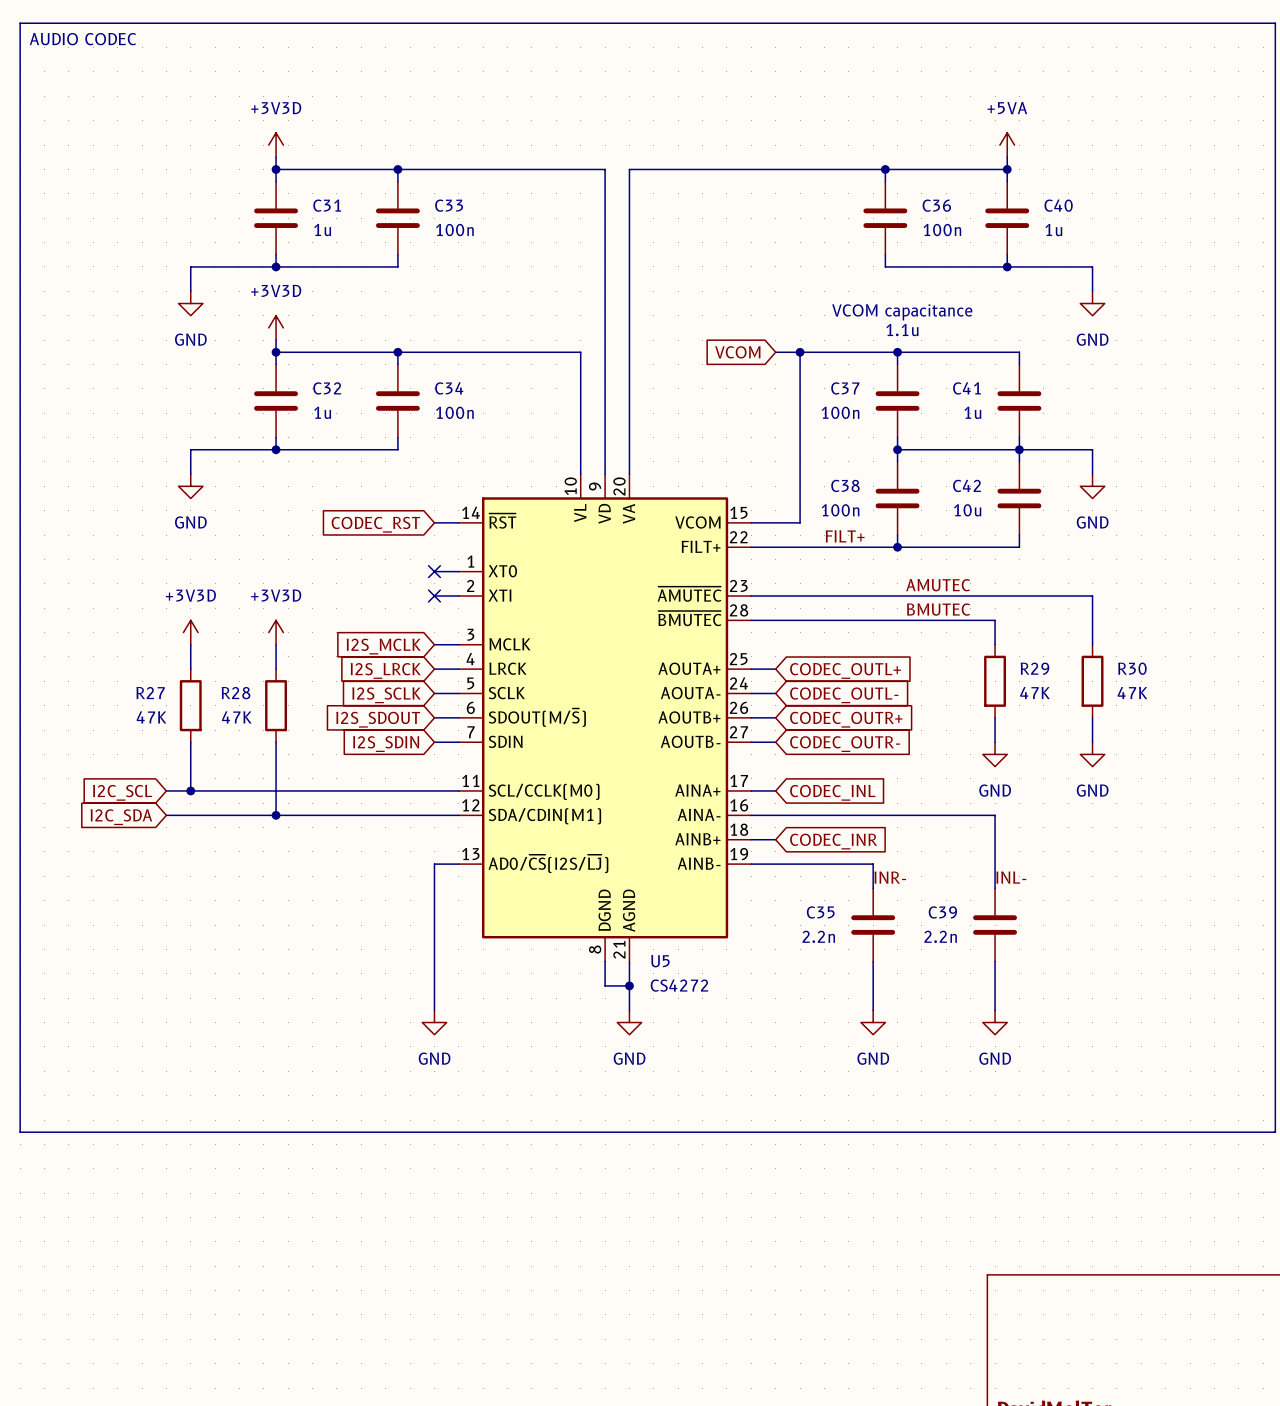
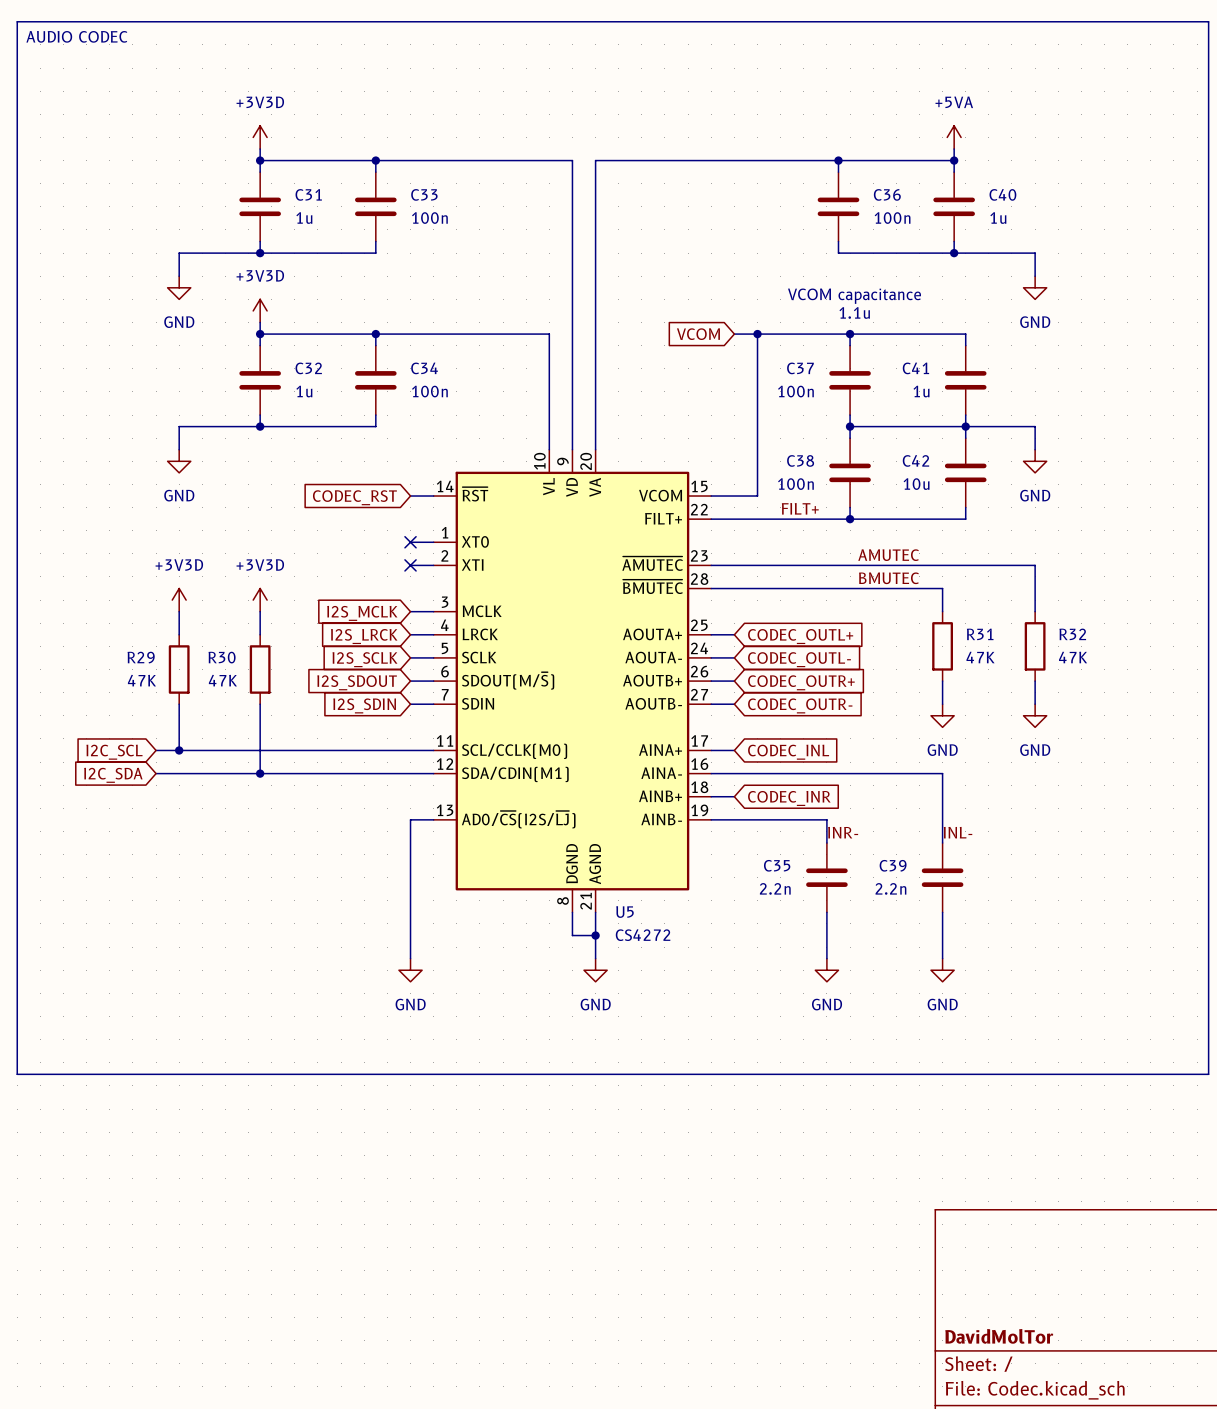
R29 name: R29 (1034, 668) -> R31 (980, 634)
R30 name: R30 (1132, 668) -> R32 (1072, 634)
R27 name: R27 (150, 693) -> R29 (141, 657)
R28 name: R28 (235, 693) -> R30 (222, 657)

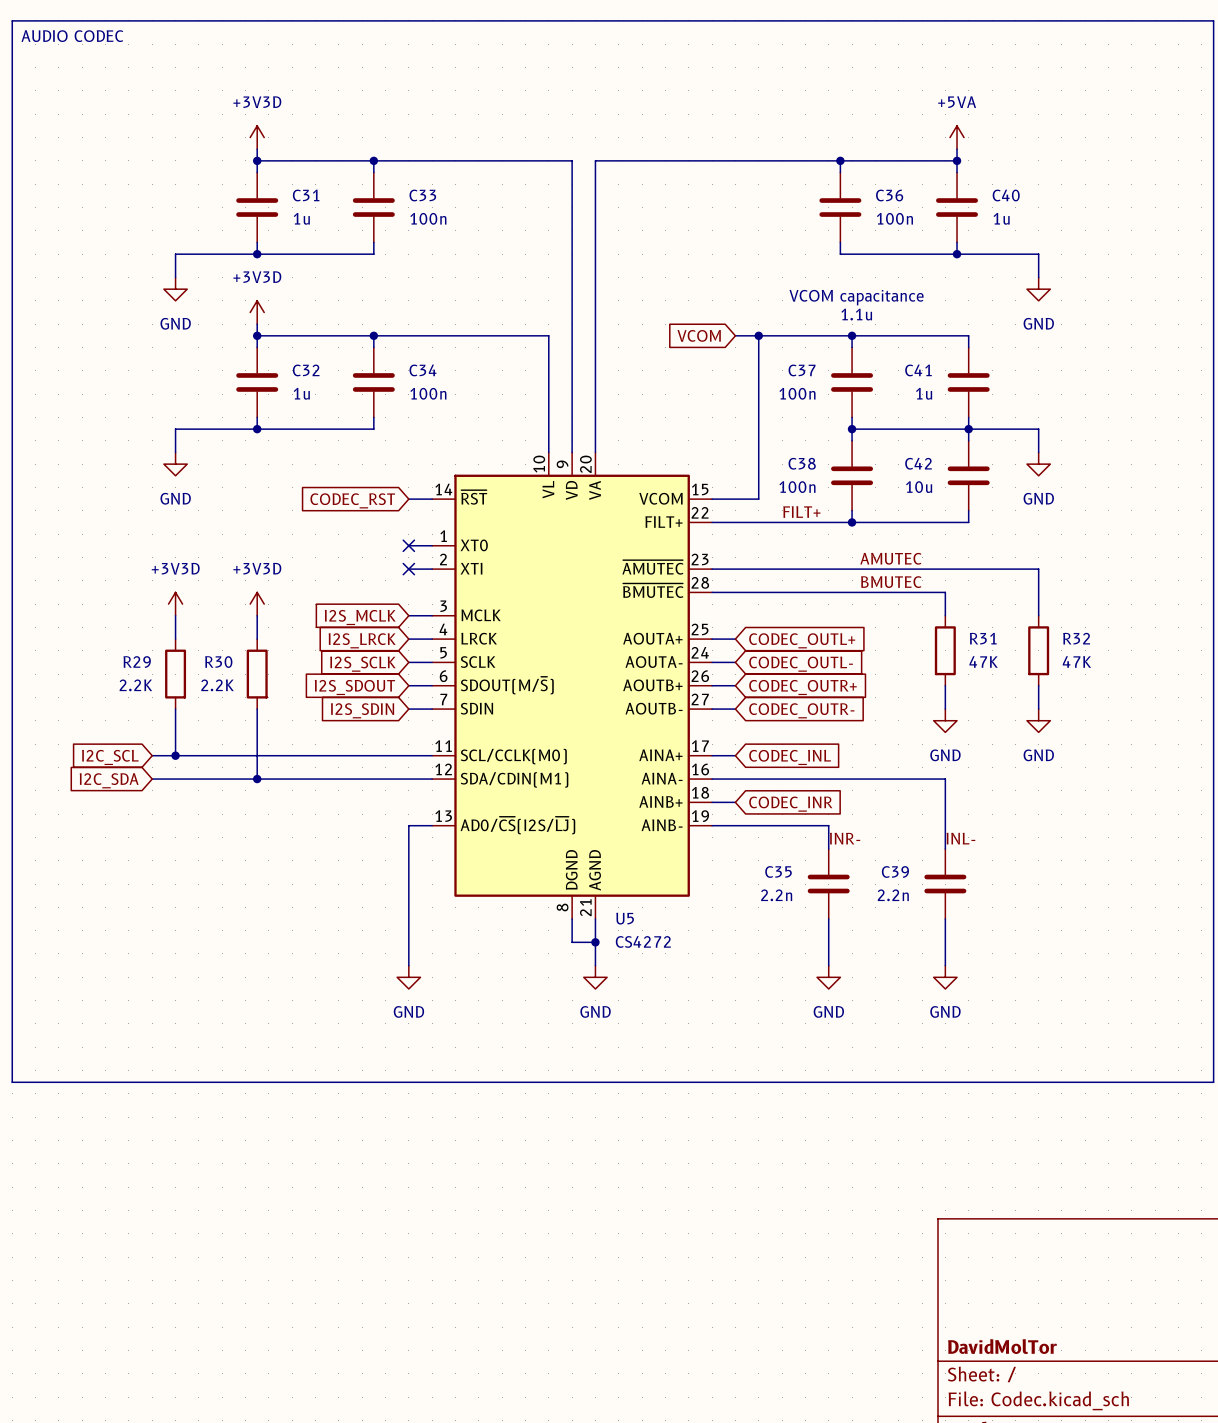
R29 value: 47K (141, 680) -> 2.2K (135, 685)
R30 value: 47K (222, 680) -> 2.2K (217, 685)

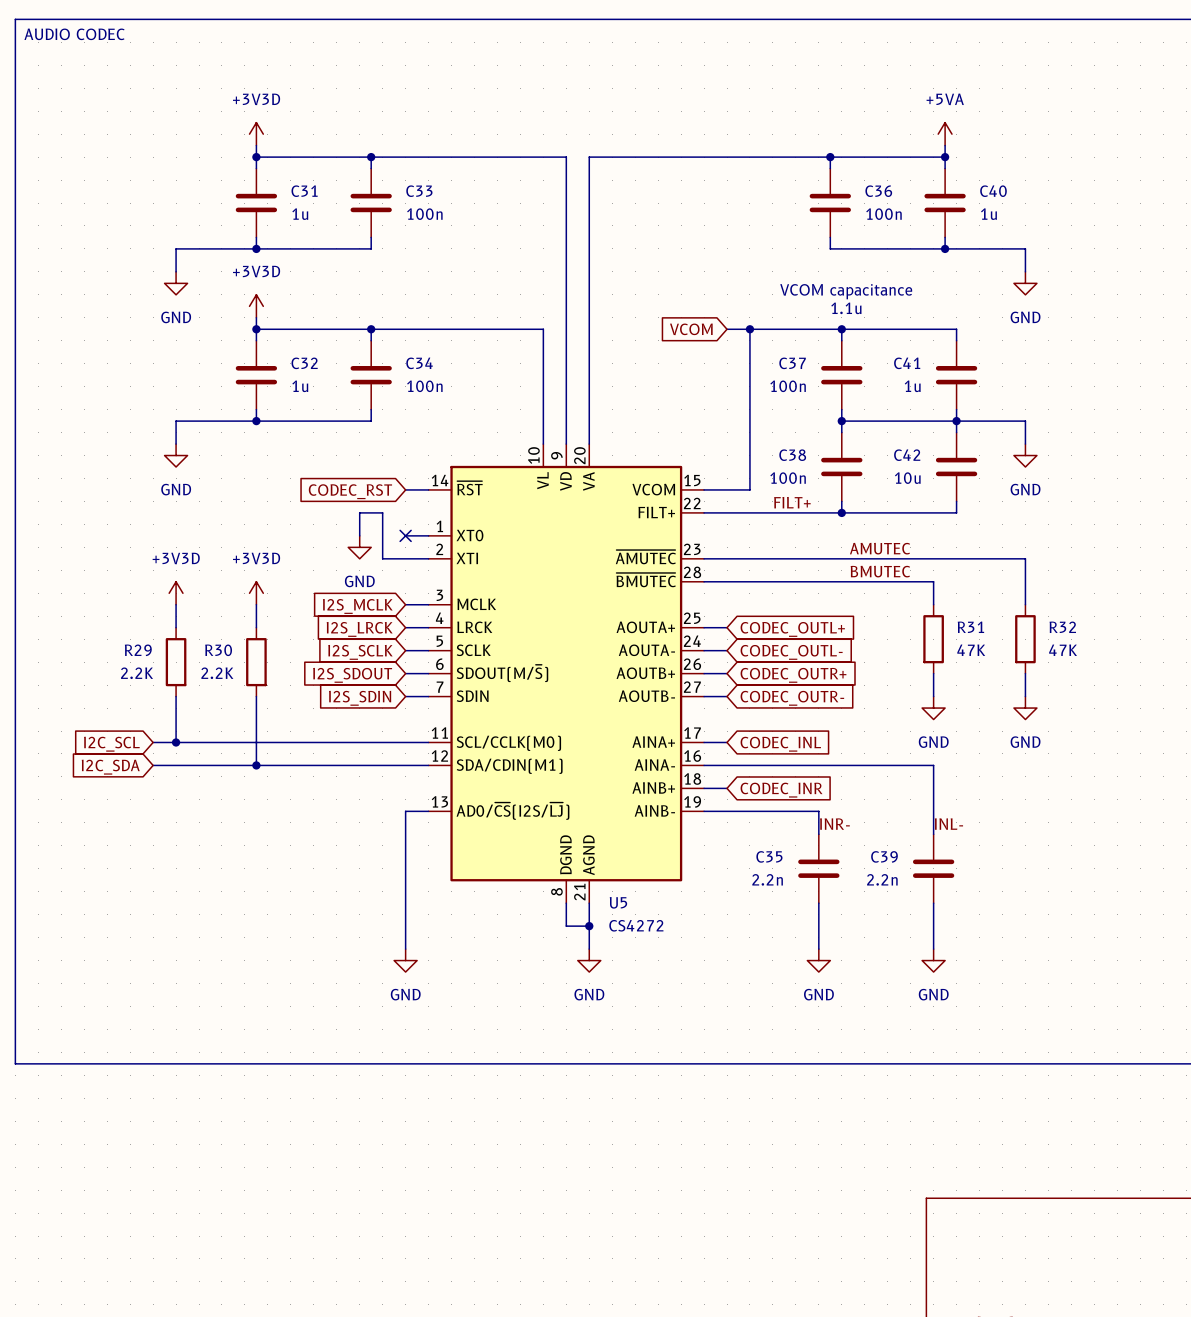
wire: none -> (359, 535) (359, 512) (382, 512) (382, 558) (405, 558)
power symbol: none -> GND (359, 547)
no-connect mark: (408, 569) -> none

